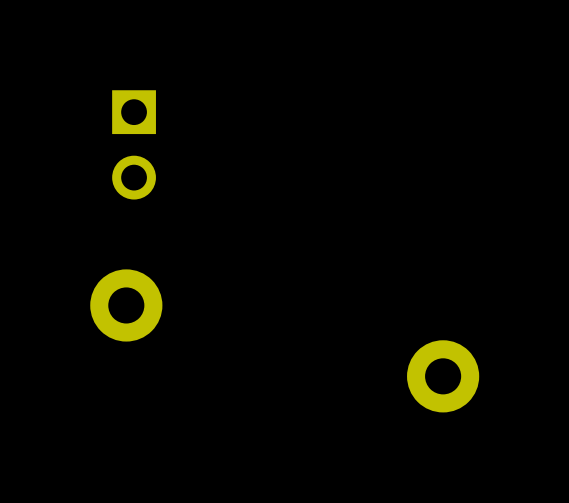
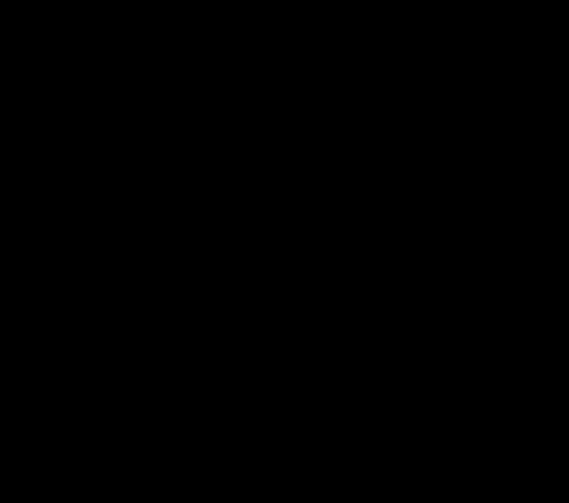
part: (134, 144) -> none
part: (126, 305) -> none
part: (443, 376) -> none

